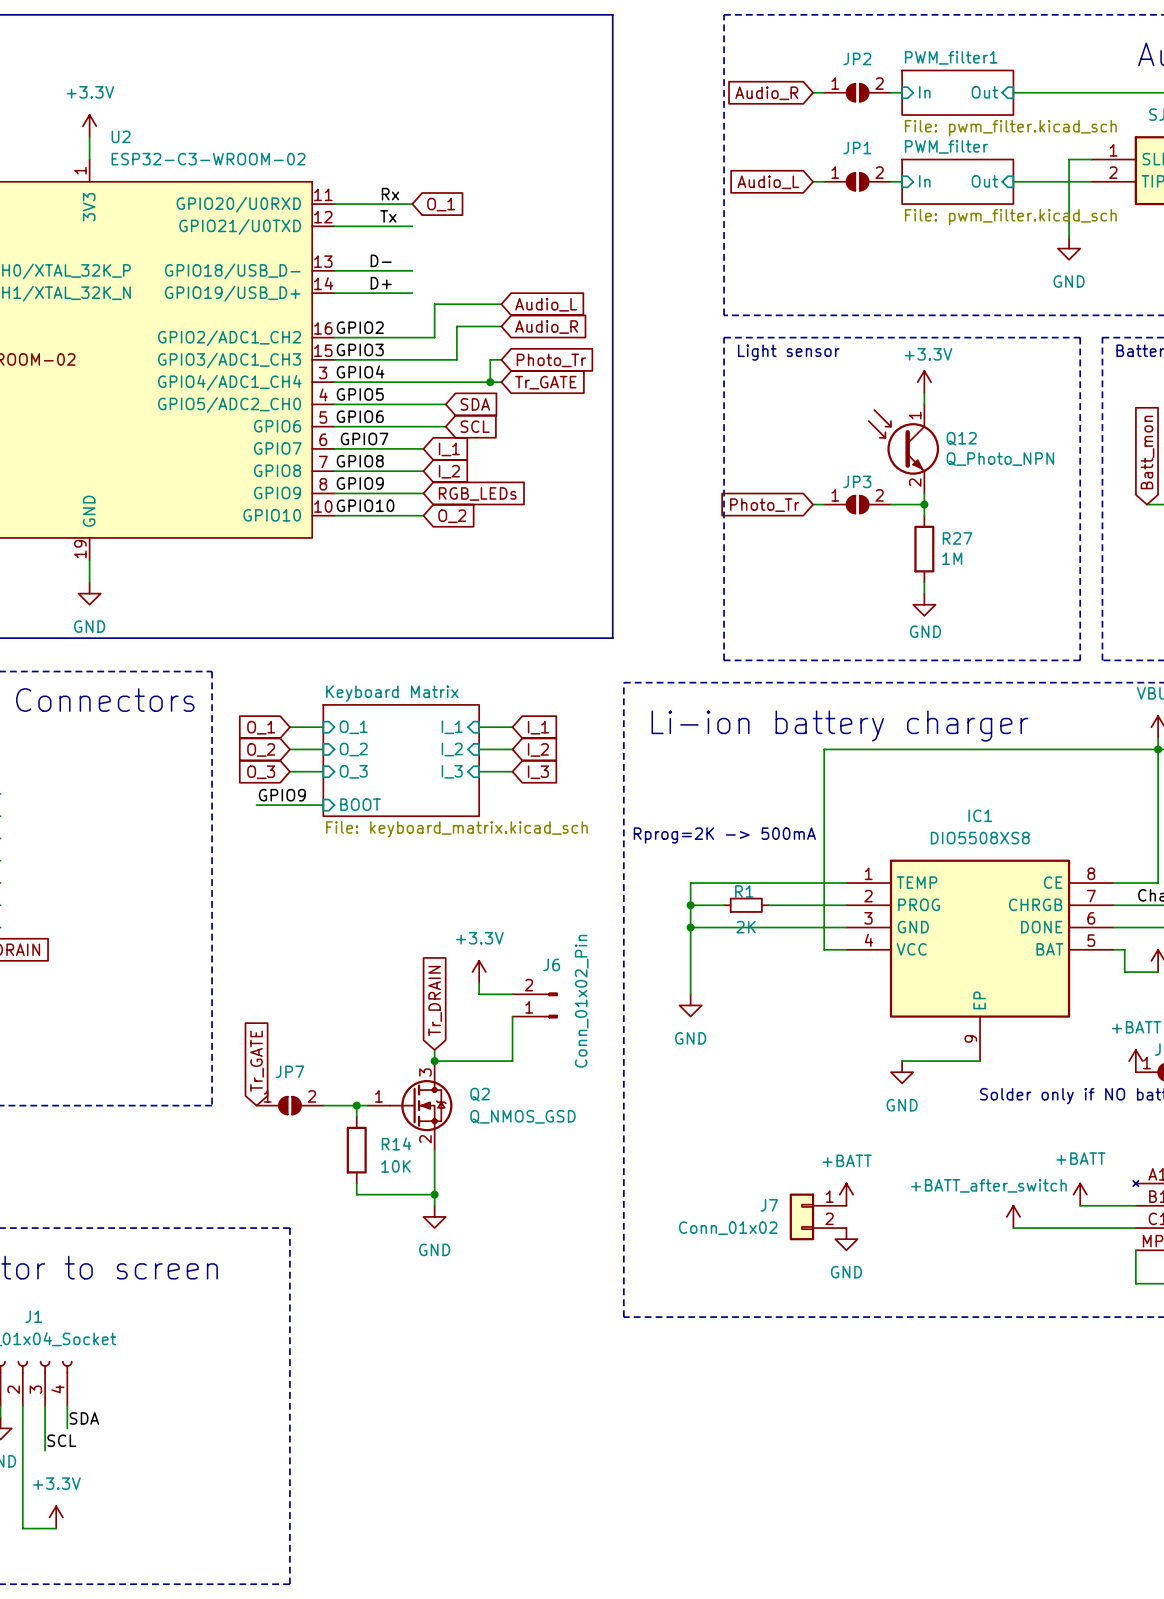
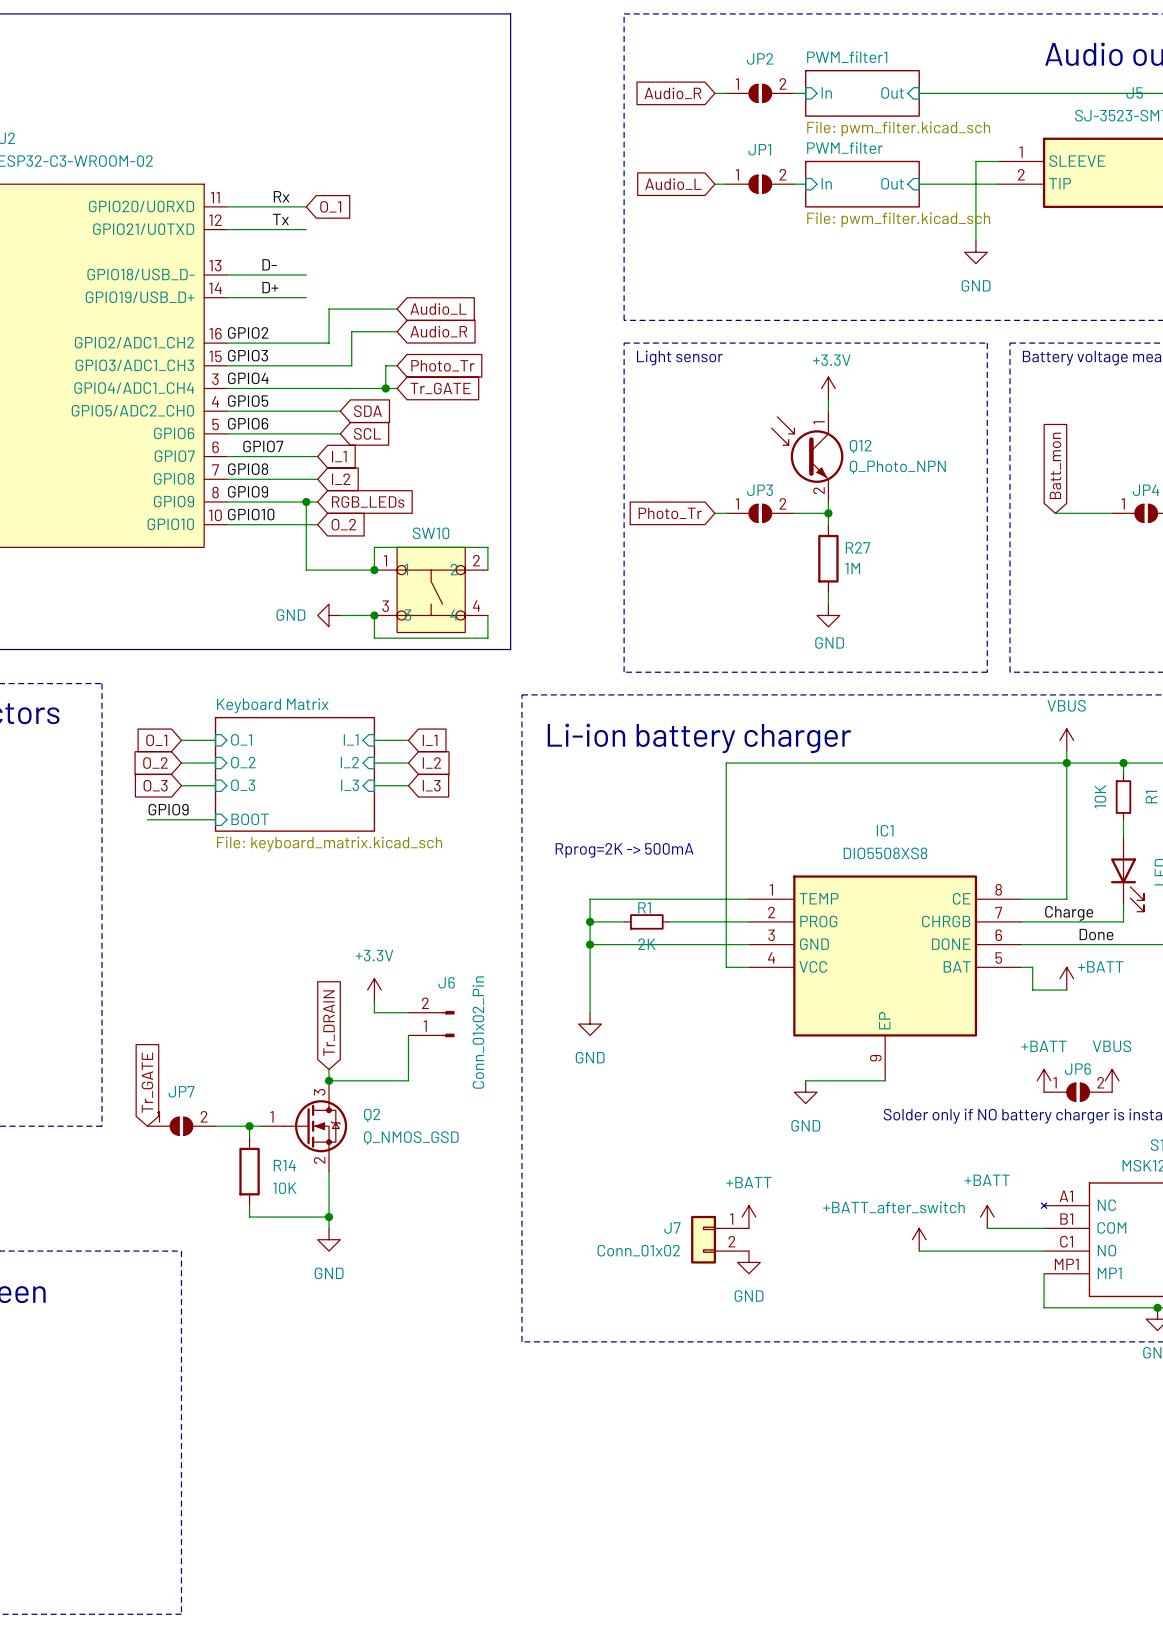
wire: none -> (306, 501) (306, 570) (374, 570) (374, 547) (487, 547) (487, 570)
junction: none -> (306, 501)
junction: none -> (374, 570)
SW10: none -> (431, 589)
power symbol: none -> GND (329, 615)
wire: none -> (340, 615) (374, 615) (374, 638) (487, 638) (487, 615)
junction: none -> (374, 615)

